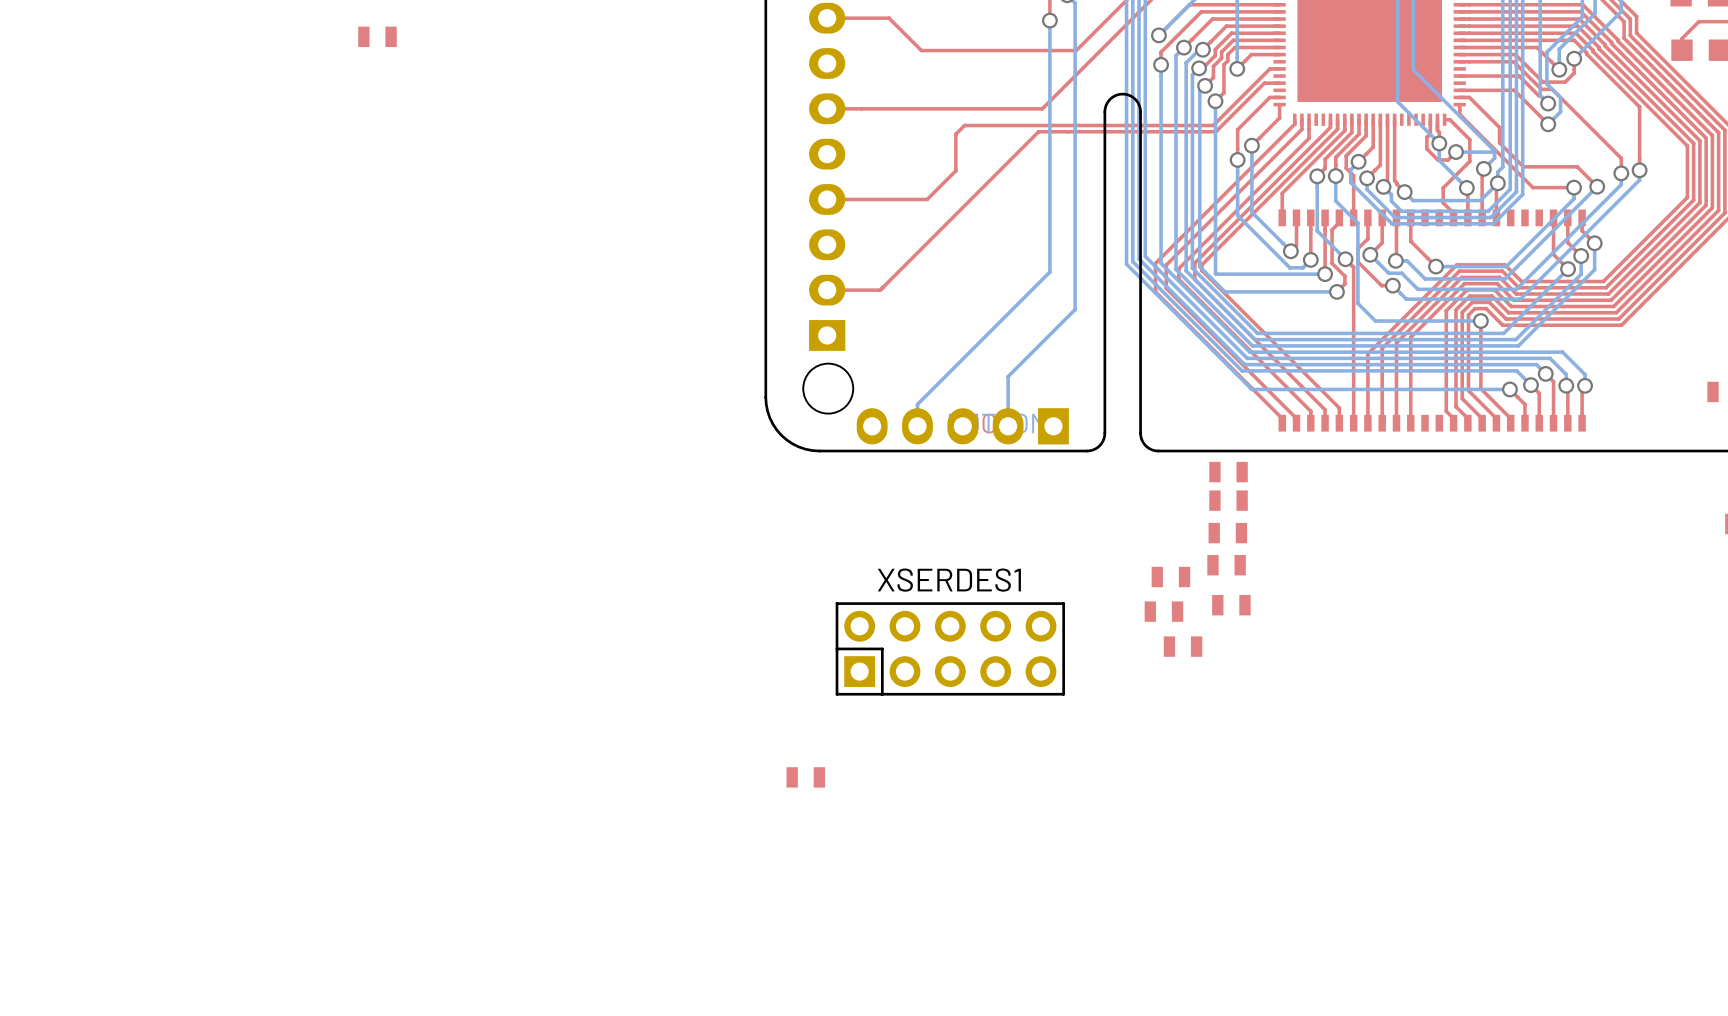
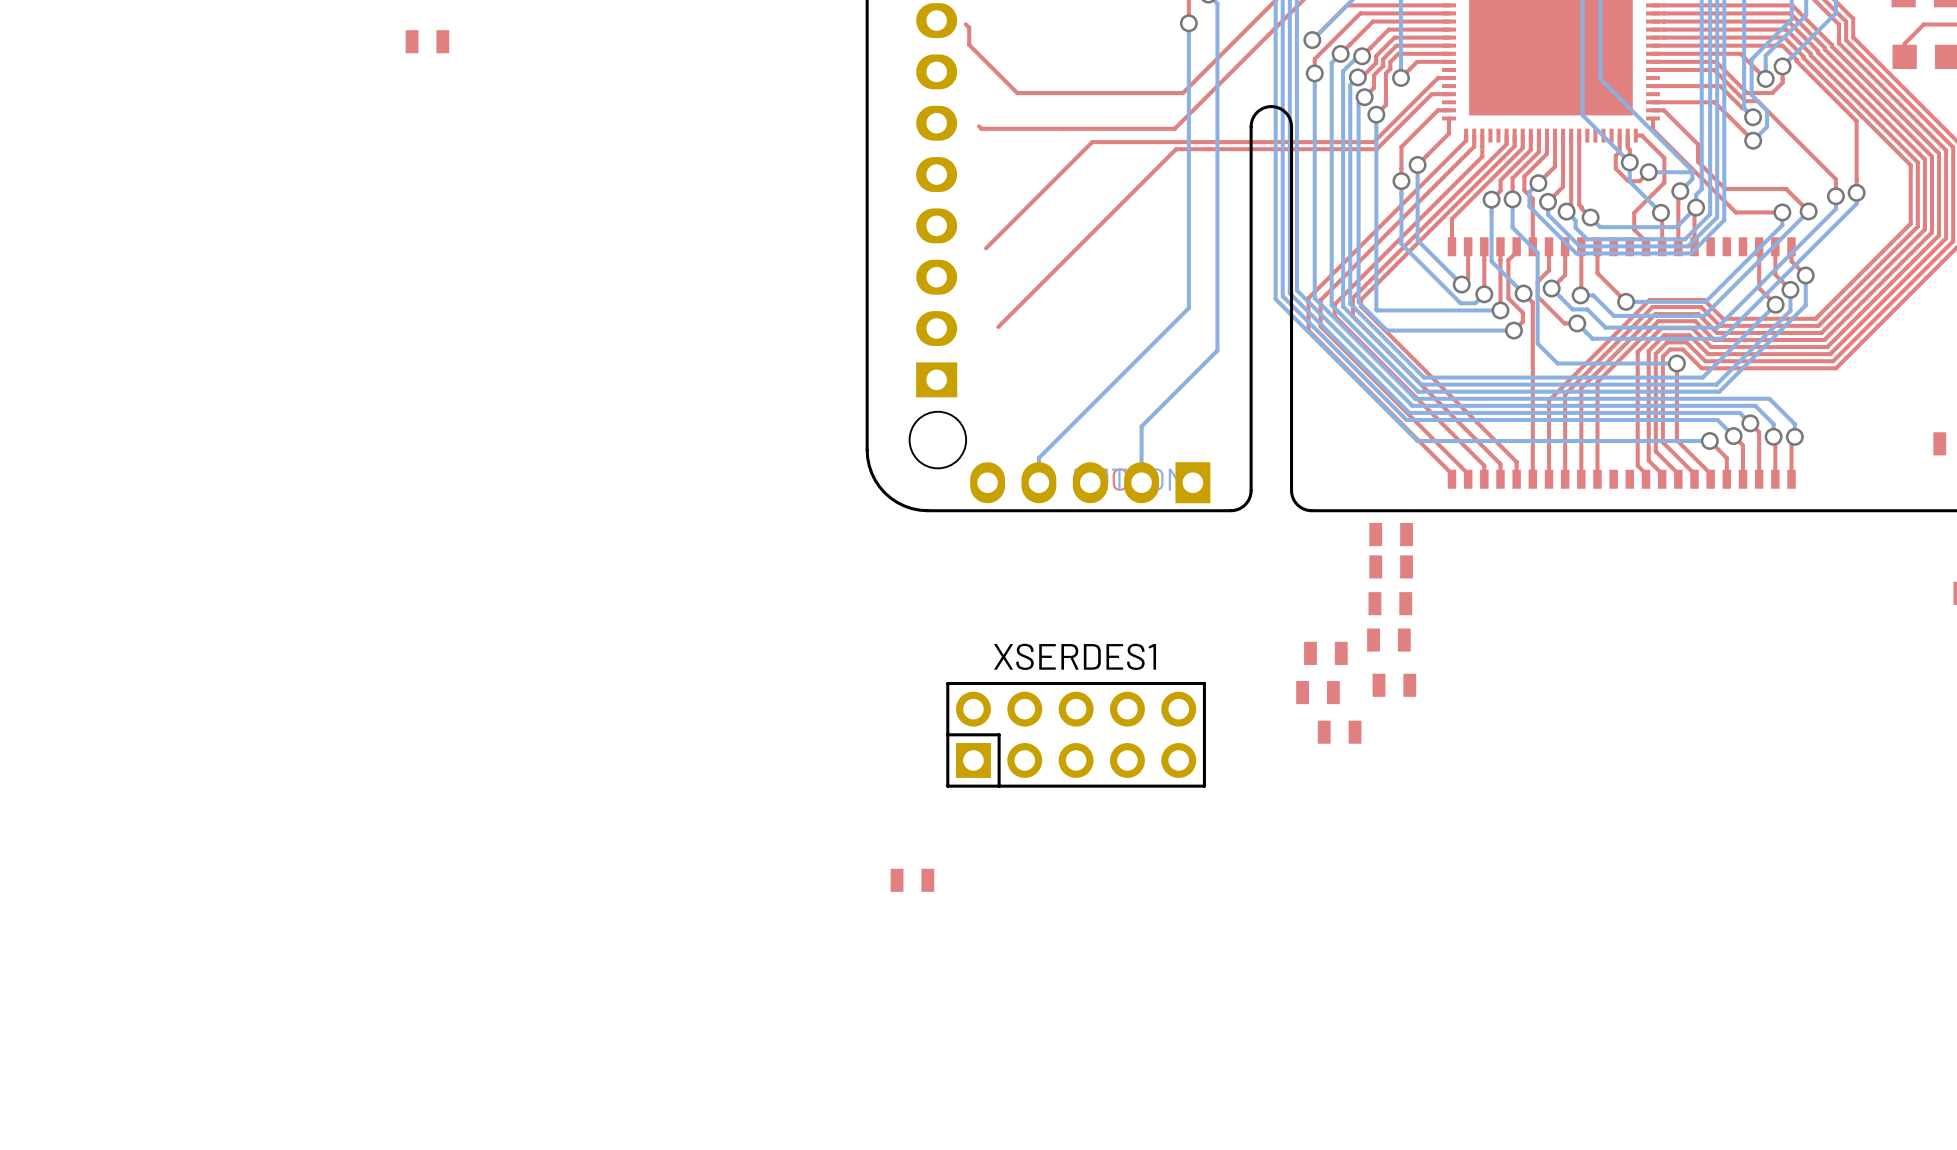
top track: (827, 18) (889, 18) (921, 50) (1076, 50) -> (965, 24) (969, 27) (969, 44) (1017, 93) (1183, 93) (1218, 57)
top track: (1042, 108) (827, 108) -> (1180, 123) (1174, 128) (981, 128) (979, 126)
top track: (955, 134) (955, 170) (927, 199) (827, 199) -> (1082, 152) (986, 248)
top track: (881, 288) (827, 290) -> none

